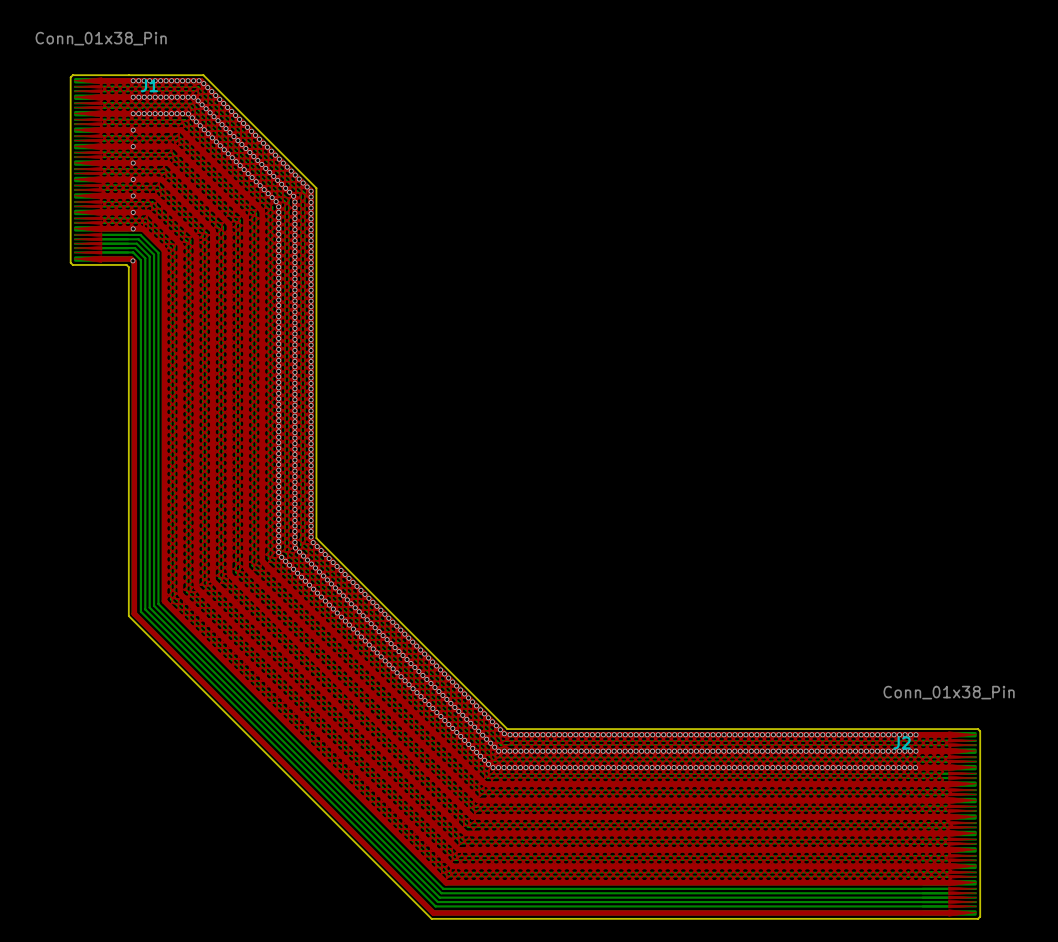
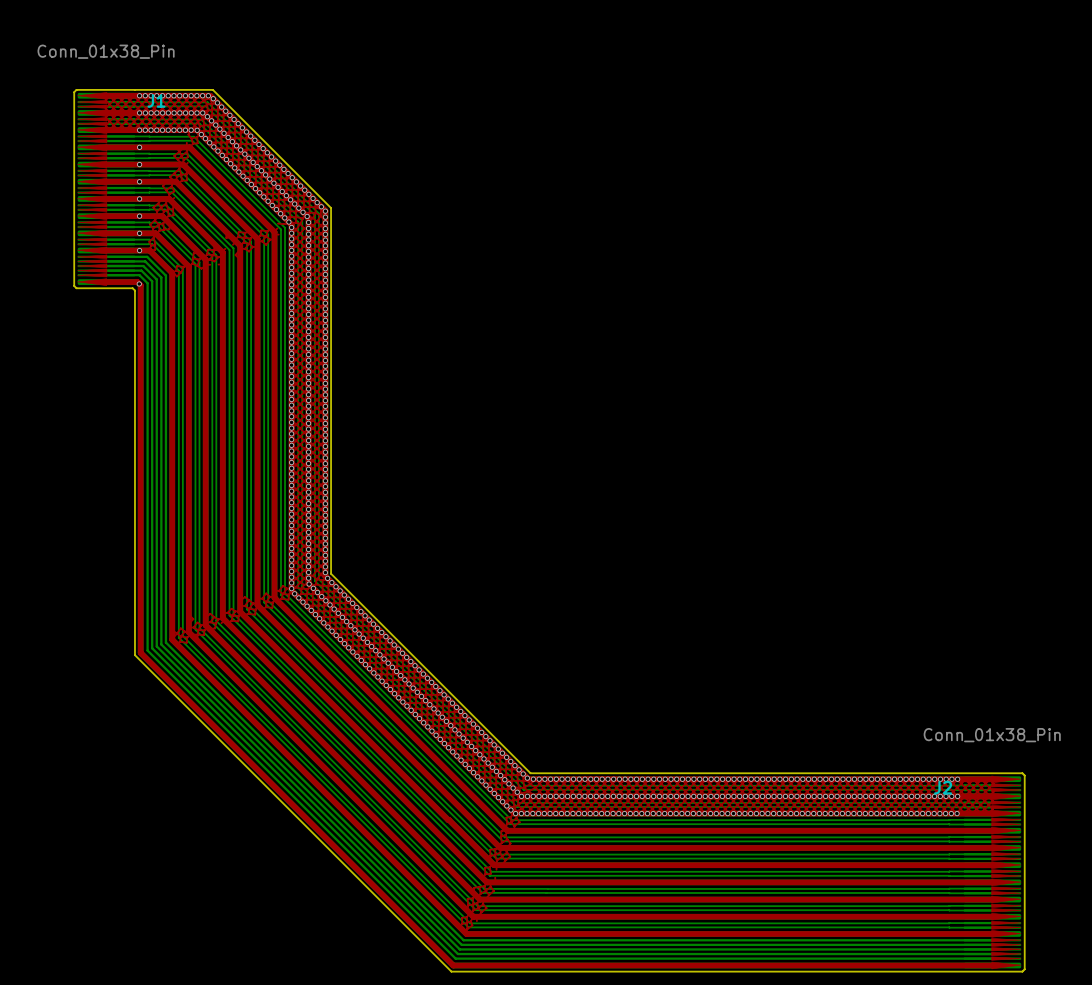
top track: (112, 114) (128, 129) (143, 114) (159, 129) (174, 114) (179, 118) (166, 129) (151, 114) (135, 129) (120, 114) (104, 129) (100, 125) (112, 114) -> none
top track: (194, 120) (194, 142) (216, 142) (216, 164) (238, 164) (238, 186) (260, 186) (260, 208) -> none
top track: (182, 121) (178, 125) (166, 114) (151, 129) (135, 114) (120, 129) (104, 114) (100, 118) (112, 129) (128, 114) (143, 129) (159, 114) (174, 129) -> none
top track: (166, 130) (150, 146) (135, 130) (119, 146) (104, 130) (100, 134) (112, 146) (127, 130) (143, 146) (158, 130) (166, 138) (158, 146) (143, 130) (127, 146) (112, 130) (100, 142) (104, 146) (119, 130) (135, 146) (150, 130) (166, 146) (169, 142) -> none
top track: (183, 131) (205, 131) (205, 153) (227, 153) (227, 175) (249, 175) (249, 197) (271, 197) (270, 209) -> none
top track: (184, 133) (184, 155) (206, 155) (206, 177) (228, 177) (228, 199) (250, 199) (250, 204) (249, 209) (239, 210) (239, 188) (217, 188) (217, 166) (195, 166) (195, 144) (184, 144) (179, 144) (179, 139) (184, 138) (189, 138) (189, 160) (211, 160) (211, 182) (233, 182) (233, 204) (255, 204) -> none
top track: (112, 147) (127, 162) (143, 147) (158, 162) (162, 158) (151, 147) (135, 162) (120, 147) (104, 162) (100, 158) (112, 147) -> none
top track: (166, 147) (151, 162) (135, 147) (120, 162) (104, 147) (100, 150) (112, 162) (127, 147) (143, 162) (158, 147) (166, 154) -> none
top track: (178, 149) (200, 149) (200, 171) (222, 171) (222, 193) (244, 193) (244, 215) -> none
top track: (178, 155) (184, 156) (184, 178) (206, 178) (206, 200) (228, 200) (228, 211) (217, 211) (217, 189) (195, 189) (195, 167) (173, 167) -> none
top track: (171, 166) (171, 188) (193, 188) (193, 210) (215, 210) -> none
top track: (158, 171) (150, 179) (135, 163) (119, 179) (104, 163) (100, 167) (112, 179) (127, 163) (143, 179) (150, 171) (155, 167) (150, 163) (135, 179) (119, 163) (104, 179) (100, 175) (112, 163) (127, 179) (143, 163) (158, 179) -> none
top track: (99, 179) (115, 195) (130, 179) (146, 195) -> none
top track: (107, 179) (123, 195) (138, 179) (146, 187) (138, 195) (123, 179) (107, 195) (99, 187) (107, 179) -> none
top track: (151, 183) (146, 179) (130, 195) (115, 179) (99, 195) -> none
top track: (166, 183) (187, 183) (187, 205) (209, 205) (209, 227) -> none
top track: (165, 189) (171, 189) (171, 211) (193, 211) (193, 233) -> none
top track: (165, 195) (176, 195) (176, 217) (198, 217) (198, 228) (187, 228) (187, 206) (165, 206) (165, 195) -> none
top track: (147, 199) (143, 196) (127, 211) (112, 196) (100, 208) (104, 211) (120, 196) (135, 211) (143, 204) (135, 196) (120, 211) (104, 196) (100, 200) (112, 211) (127, 196) (143, 211) -> none
top track: (160, 200) (182, 200) (182, 222) (204, 222) -> none
top track: (265, 203) (254, 203) (254, 181) (232, 181) (232, 159) (210, 159) (210, 137) (188, 137) (188, 126) (199, 126) (199, 148) (221, 148) (221, 170) (243, 170) (243, 192) (265, 192) (265, 203) -> none
top track: (265, 203) (265, 207) (270, 209) -> none
top track: (156, 208) (156, 220) (178, 220) (178, 242) -> none
top track: (161, 208) (162, 225) (184, 225) (185, 231) (167, 231) (167, 209) (161, 208) -> none
top track: (278, 208) (262, 223) (278, 239) (262, 254) (278, 270) (262, 285) (278, 301) (262, 317) (278, 332) (262, 348) (278, 363) (262, 379) (278, 394) (262, 410) (278, 425) (262, 441) (278, 456) (262, 472) (278, 487) (262, 503) (278, 518) (262, 534) (278, 549) -> none
top track: (270, 209) (266, 213) (278, 223) (262, 239) (278, 254) (262, 270) (278, 285) (262, 301) (278, 317) (262, 332) (278, 348) (262, 363) (278, 379) (262, 394) (278, 410) (262, 425) (278, 441) (262, 456) (278, 472) (262, 487) (278, 503) (262, 518) (278, 534) (262, 549) -> none
top track: (270, 209) (278, 216) (262, 231) (278, 247) (262, 262) (278, 278) (262, 293) (278, 309) (262, 324) (278, 340) (262, 355) (278, 371) (262, 386) (278, 402) (262, 417) (278, 433) (262, 448) (278, 464) (262, 479) (278, 495) (262, 510) (278, 526) (262, 541) (270, 549) (278, 541) (262, 526) (278, 510) (262, 495) (278, 479) (262, 464) (278, 448) (262, 433) (278, 417) (262, 402) (278, 386) (262, 371) (278, 355) (262, 340) (278, 324) (262, 309) (278, 293) (262, 278) (278, 262) (262, 247) (278, 231) (262, 216) -> none
top track: (234, 211) (233, 205) (211, 205) (211, 183) (189, 183) (189, 161) (178, 161) (178, 172) (200, 172) (200, 194) (222, 194) (222, 216) -> none
top track: (143, 212) (127, 228) (112, 212) (100, 224) (104, 228) (120, 212) (135, 228) (139, 224) (142, 220) (139, 216) (135, 212) (120, 228) (104, 212) (100, 216) (112, 228) (127, 212) (143, 228) -> none
top track: (151, 214) (173, 214) (173, 236) (184, 236) -> none
top track: (153, 216) (153, 238) (175, 238) -> none
top track: (148, 222) (158, 222) (158, 244) (164, 244) (169, 243) (169, 233) (147, 233) (148, 228) (153, 227) (164, 227) (164, 249) -> none
top track: (215, 222) (204, 221) (204, 199) (182, 199) (182, 177) (171, 177) (166, 178) (166, 172) (176, 172) (176, 194) (198, 194) (198, 216) (209, 216) (216, 216) (215, 222) -> none
top track: (215, 222) (215, 227) (221, 229) (213, 238) (228, 253) (213, 269) (228, 284) (213, 300) (228, 315) (213, 331) (228, 346) (213, 362) (228, 377) (213, 393) (228, 408) (213, 424) (228, 439) (213, 455) (228, 470) (213, 486) (228, 501) (213, 517) (228, 532) (213, 548) (228, 563) (221, 571) (213, 563) (228, 548) (213, 532) (228, 517) (213, 501) (228, 486) (213, 470) (228, 455) (213, 439) (228, 424) (213, 408) (228, 393) (213, 377) (228, 362) (213, 346) (228, 331) (213, 315) (228, 300) (213, 284) (228, 269) (213, 253) (228, 238) -> none
top track: (215, 222) (222, 223) (221, 229) (225, 233) (213, 245) (228, 261) (213, 276) (228, 292) (213, 307) (228, 323) (213, 338) (228, 354) (213, 369) (228, 385) (213, 400) (228, 416) (213, 432) (228, 447) (213, 463) (228, 478) (213, 494) (228, 509) (213, 525) (228, 540) (213, 556) (228, 571) -> none
top track: (246, 223) (262, 238) (246, 254) (262, 269) (246, 285) (262, 300) (246, 316) (262, 332) (246, 347) (262, 363) (246, 378) (262, 394) (246, 409) (262, 425) (246, 440) (262, 456) (246, 471) (262, 487) (246, 502) (262, 518) (246, 533) (262, 549) (254, 556) (246, 549) (262, 533) (246, 518) (262, 502) (246, 487) (262, 471) (246, 456) (262, 440) (246, 425) (262, 409) (246, 394) (262, 378) (246, 363) (262, 347) (246, 332) (262, 316) (246, 300) (262, 285) (246, 269) (262, 254) (246, 238) (262, 223) -> none
top track: (230, 229) (245, 245) (230, 260) (245, 276) (230, 291) (245, 307) (230, 322) (245, 338) (230, 353) (245, 369) (230, 384) (245, 400) (230, 416) (245, 431) (230, 447) (245, 462) (230, 478) (245, 493) (230, 509) (245, 524) (230, 540) (245, 555) (237, 563) -> none
top track: (245, 229) (230, 245) (245, 260) (230, 276) (245, 291) (230, 307) (245, 322) (230, 338) (245, 353) (230, 369) (245, 384) (230, 400) (245, 416) (230, 431) (245, 447) (230, 462) (245, 478) (230, 493) (245, 509) (230, 524) (245, 540) (230, 555) (233, 560) (237, 555) (245, 547) (230, 532) (245, 516) (230, 501) (245, 485) (230, 470) (245, 454) (230, 439) (245, 423) (230, 408) (245, 392) (230, 377) (245, 361) (230, 346) (245, 330) (230, 315) (245, 299) (230, 284) (245, 268) (230, 253) (245, 237) (237, 229) (230, 237) (245, 253) (230, 268) (245, 284) (230, 299) (245, 315) (230, 330) (245, 346) (230, 361) (245, 377) (230, 392) (245, 408) (230, 423) (245, 439) (230, 454) (245, 470) (230, 485) (245, 501) (230, 516) (245, 532) (230, 547) (245, 563) -> none
top track: (213, 230) (228, 245) (213, 261) (228, 276) (213, 292) (228, 307) (213, 323) (228, 338) (213, 354) (228, 369) (213, 385) (228, 400) (213, 416) (228, 432) (213, 447) (228, 463) (213, 478) (228, 494) (213, 509) (228, 525) (213, 540) (228, 556) (213, 571) -> none
top track: (180, 243) (196, 259) (180, 274) (196, 290) (180, 305) (196, 321) (180, 336) (196, 352) (180, 367) (196, 383) (180, 398) (196, 414) (180, 429) (196, 445) (180, 460) (196, 476) (180, 491) (196, 507) (180, 522) (196, 538) (180, 553) (196, 569) (188, 577) (184, 581) (188, 584) (196, 577) (180, 561) (196, 546) (180, 530) (196, 515) (180, 499) (196, 484) (180, 468) (196, 453) (180, 437) (196, 421) (180, 406) (196, 390) (180, 375) (196, 359) (180, 344) (196, 328) (180, 313) (196, 297) (180, 282) (196, 266) (180, 251) (188, 243) -> none
top track: (197, 246) (212, 261) (197, 277) (212, 292) (197, 308) (212, 323) (197, 339) (212, 354) (197, 370) (212, 386) (197, 401) (212, 417) (197, 432) (212, 448) (197, 463) (212, 479) (197, 494) (212, 510) (197, 525) (212, 541) (197, 556) (212, 572) (204, 579) -> none
top track: (212, 246) (197, 261) (212, 277) (197, 292) (212, 308) (197, 323) (212, 339) (197, 354) (212, 370) (197, 386) (212, 401) (197, 417) (212, 432) (197, 448) (212, 463) (197, 479) (212, 494) (197, 510) (212, 525) (197, 541) (212, 556) (197, 572) (200, 576) (204, 572) (212, 564) (197, 548) (212, 533) (197, 517) (212, 502) (197, 486) (212, 471) (197, 455) (212, 440) (197, 424) (212, 409) (197, 393) (212, 378) (197, 362) (212, 347) (197, 331) (212, 316) (197, 300) (212, 285) (197, 269) (212, 254) (200, 242) (204, 239) (208, 242) (204, 246) (197, 254) (212, 269) (197, 285) (212, 300) (197, 316) (212, 331) (197, 347) (212, 362) (197, 378) (212, 393) (197, 409) (212, 424) (197, 440) (212, 455) (197, 471) (212, 486) (197, 502) (212, 517) (197, 533) (212, 548) (197, 564) (212, 579) -> none
top track: (172, 249) (180, 256) (164, 272) (180, 287) (164, 303) (180, 318) (164, 334) (180, 349) (164, 365) (180, 380) (164, 396) (180, 411) (164, 427) (180, 442) (164, 458) (180, 474) (164, 489) (180, 505) (164, 520) (180, 536) (164, 551) (180, 567) (164, 582) (172, 590) (180, 582) (164, 567) (180, 551) (164, 536) (180, 520) (164, 505) (180, 489) (164, 474) (180, 458) (164, 442) (180, 427) (164, 411) (180, 396) (164, 380) (180, 365) (164, 349) (180, 334) (164, 318) (180, 303) (164, 287) (180, 272) (164, 256) (168, 253) (172, 256) (180, 264) (164, 280) (180, 295) (164, 311) (180, 326) (164, 342) (180, 357) (164, 373) (180, 388) (164, 404) (180, 419) (164, 435) (180, 450) (164, 466) (180, 481) (164, 497) (180, 512) (164, 528) (180, 543) (164, 559) (180, 574) (164, 590) -> none
top track: (180, 249) (164, 264) (180, 280) (164, 295) (180, 311) (164, 326) (180, 342) (164, 357) (180, 373) (164, 388) (180, 404) (164, 419) (180, 435) (164, 450) (180, 466) (164, 481) (180, 497) (164, 512) (180, 528) (164, 543) (180, 559) (164, 574) (180, 590) -> none
top track: (246, 556) (262, 541) (246, 525) (262, 510) (246, 494) (262, 479) (246, 463) (262, 448) (246, 432) (262, 417) (246, 401) (262, 386) (246, 370) (262, 355) (246, 339) (262, 324) (246, 308) (262, 293) (246, 277) (262, 262) (246, 246) (262, 231) (254, 223) (246, 231) (262, 246) (246, 262) (262, 277) (246, 293) (262, 308) (246, 324) (262, 339) (246, 355) (262, 370) (246, 386) (262, 401) (246, 417) (262, 432) (246, 448) (262, 463) (246, 479) (262, 494) (246, 510) (262, 525) (246, 541) (262, 556) -> none
top track: (281, 557) (281, 579) (303, 579) (303, 601) (325, 601) (325, 623) (347, 623) (347, 645) (369, 645) (369, 667) (390, 667) (390, 689) (412, 689) (412, 711) (434, 711) (434, 733) (456, 733) (456, 755) (478, 755) (478, 777) -> none
top track: (275, 563) (286, 563) (286, 585) (308, 585) (308, 606) (330, 606) (330, 628) (352, 628) (352, 650) (374, 650) (374, 672) (396, 672) (396, 694) (418, 694) (418, 716) (440, 716) (440, 738) (462, 738) (462, 760) (484, 760) (484, 771) (473, 771) (473, 749) (451, 749) (451, 727) (429, 727) (429, 705) (407, 705) (407, 683) (385, 683) (385, 661) (363, 661) (363, 639) (341, 639) (341, 617) (319, 617) (319, 596) (297, 596) (297, 574) (275, 574) (275, 563) -> none
top track: (265, 565) (265, 587) (287, 587) (287, 609) (309, 609) (309, 631) (331, 631) (331, 653) (353, 653) (353, 675) (375, 675) (375, 696) (397, 696) (397, 718) (419, 718) (419, 740) (441, 740) (441, 762) (463, 762) (463, 784) (474, 784) (479, 784) (479, 779) (457, 779) (457, 757) (435, 757) (435, 735) (413, 735) (413, 713) (391, 713) (391, 691) (370, 691) (370, 669) (348, 669) (348, 647) (326, 647) (326, 625) (304, 625) (304, 603) (282, 603) (282, 581) (260, 581) (260, 570) (271, 570) (271, 592) (293, 592) (293, 614) (315, 614) (315, 636) (337, 636) (337, 658) (359, 658) (359, 680) (381, 680) (381, 702) (402, 702) (402, 724) (424, 724) (424, 746) (446, 746) (446, 768) (468, 768) (468, 790) (479, 789) -> none
top track: (270, 568) (292, 568) (292, 590) (314, 590) (314, 612) (336, 612) (336, 634) (358, 634) (358, 656) (380, 656) (380, 678) (401, 678) (401, 700) (423, 700) (423, 722) (445, 722) (445, 744) (467, 744) (467, 766) (488, 766) -> none
top track: (249, 571) (249, 593) (271, 593) (271, 615) (293, 615) (293, 637) (315, 637) (315, 659) (337, 659) (337, 681) (358, 681) (358, 703) (380, 703) (380, 725) (402, 725) (402, 747) (424, 747) (424, 769) (446, 769) (446, 791) (468, 791) (468, 802) (457, 802) (457, 780) (435, 780) (435, 758) (413, 758) (413, 736) (391, 736) (391, 714) (369, 714) (369, 692) (348, 692) (348, 670) (326, 670) (326, 648) (304, 648) (304, 626) (282, 626) (282, 604) (260, 604) (260, 582) (238, 582) (237, 576) -> none
top track: (254, 576) (276, 576) (276, 598) (298, 598) (298, 620) (320, 620) (320, 642) (342, 642) (342, 664) (364, 664) (364, 685) (386, 685) (386, 707) (408, 707) (408, 729) (430, 729) (430, 751) (452, 751) (452, 773) (474, 773) (474, 795) -> none
top track: (180, 577) (196, 561) (180, 546) (196, 530) (180, 515) (196, 499) (180, 484) (196, 468) (180, 453) (196, 437) (180, 421) (196, 406) (180, 390) (196, 375) (180, 359) (196, 344) (180, 328) (196, 313) (180, 297) (196, 282) (180, 266) (196, 251) (192, 246) (180, 259) (196, 274) (180, 290) (196, 305) (180, 321) (196, 336) (180, 352) (196, 367) (180, 383) (196, 398) (180, 414) (196, 429) (180, 445) (196, 460) (180, 476) (196, 491) (180, 507) (196, 522) (180, 538) (196, 553) (180, 569) (196, 584) -> none
top track: (233, 578) (233, 600) (255, 600) (255, 622) (277, 622) (277, 644) (299, 644) (299, 666) (320, 666) (320, 687) (342, 687) (342, 709) (364, 709) (364, 731) (386, 731) (386, 753) (408, 753) (408, 775) (430, 775) (430, 797) (452, 797) (452, 819) (463, 819) (463, 808) (441, 808) (441, 786) (419, 786) (419, 764) (397, 764) (397, 742) (375, 742) (375, 720) (353, 720) (353, 698) (331, 698) (331, 676) (310, 676) (310, 655) (288, 655) (288, 633) (266, 633) (266, 611) (244, 611) (244, 589) (222, 589) -> none
top track: (206, 585) (211, 585) (211, 601) (233, 601) (233, 623) (255, 623) (255, 645) (277, 645) (277, 667) (299, 667) (299, 689) (321, 689) (321, 711) (343, 711) (343, 733) (365, 733) (365, 755) (387, 755) (387, 777) (409, 777) (409, 799) (430, 799) (430, 821) (452, 821) (452, 832) (453, 838) (447, 837) (447, 815) (425, 815) (425, 793) (403, 793) (403, 771) (381, 771) (381, 750) (359, 750) (359, 728) (337, 728) (337, 706) (315, 706) (315, 684) (293, 684) (293, 662) (271, 662) (271, 640) (249, 640) (249, 618) (228, 618) (228, 596) (206, 596) (205, 590) (211, 590) (222, 590) (222, 612) (244, 612) (244, 634) (266, 634) (266, 656) (288, 656) (288, 678) (310, 678) (310, 700) (332, 700) (332, 722) (354, 722) (354, 744) (376, 744) (376, 766) (398, 766) (398, 788) (420, 788) (420, 810) (441, 810) (441, 832) (463, 832) -> none
top track: (217, 585) (217, 607) (238, 607) (238, 629) (260, 629) (260, 651) (282, 651) (282, 673) (304, 673) (304, 695) (326, 695) (326, 717) (348, 717) (348, 739) (370, 739) (370, 760) (392, 760) (392, 782) (414, 782) (414, 804) (436, 804) (436, 826) (458, 826) (458, 837) -> none
top track: (200, 591) (200, 613) (222, 613) (222, 635) (244, 635) (244, 657) (266, 657) (266, 679) (287, 679) (287, 701) (309, 701) (309, 723) (331, 723) (331, 745) (353, 745) (353, 766) (375, 766) (375, 788) (397, 788) (397, 810) (419, 810) (419, 832) (441, 832) (441, 854) (447, 855) -> none
top track: (194, 596) (194, 607) (216, 607) (216, 629) (238, 629) (238, 651) (260, 651) (260, 673) (282, 673) (282, 695) (304, 695) (304, 717) (326, 717) (326, 739) (348, 739) (348, 761) (370, 761) (370, 783) (392, 783) (392, 805) (414, 805) (414, 827) (436, 827) (436, 849) (447, 849) (447, 838) (425, 838) (425, 816) (403, 816) (403, 794) (381, 794) (381, 772) (359, 772) (359, 750) (337, 750) (337, 728) (315, 728) (315, 706) (293, 706) (293, 684) (271, 684) (271, 662) (249, 662) (249, 640) (227, 640) (227, 618) (205, 618) (205, 596) (194, 596) -> none
top track: (183, 598) (183, 620) (205, 620) (205, 642) (227, 642) (227, 664) (249, 664) (249, 686) (271, 686) (271, 708) (293, 708) (293, 730) (315, 730) (315, 752) (337, 752) (337, 774) (359, 774) (359, 796) (381, 796) (381, 818) (403, 818) (403, 840) (425, 840) (425, 862) (447, 862) -> none
top track: (189, 602) (211, 602) (211, 624) (233, 624) (233, 646) (255, 646) (255, 668) (277, 668) (277, 690) (298, 690) (298, 712) (320, 712) (320, 734) (342, 734) (342, 756) (364, 756) (364, 777) (386, 777) (386, 799) (408, 799) (408, 821) (430, 821) (430, 843) (452, 843) -> none
top track: (178, 604) (189, 604) (189, 626) (211, 626) (211, 648) (233, 648) (233, 670) (255, 670) (255, 691) (277, 691) (277, 713) (299, 713) (299, 735) (321, 735) (321, 757) (342, 757) (342, 779) (364, 779) (364, 801) (386, 801) (386, 823) (408, 823) (408, 845) (430, 845) (430, 867) (441, 867) (441, 856) (419, 856) (419, 834) (397, 834) (397, 812) (375, 812) (375, 790) (353, 790) (353, 768) (332, 768) (332, 746) (310, 746) (310, 724) (288, 724) (288, 702) (266, 702) (266, 681) (244, 681) (244, 659) (222, 659) (222, 637) (200, 637) (200, 615) (178, 615) (178, 604) -> none
top track: (172, 609) (194, 609) (194, 631) (216, 631) (216, 653) (238, 653) (238, 675) (260, 675) (260, 697) (282, 697) (282, 719) (304, 719) (304, 741) (326, 741) (326, 763) (348, 763) (348, 785) (370, 785) (370, 807) (392, 807) (392, 829) (414, 829) (414, 851) (436, 851) (436, 873) -> none
top track: (497, 769) (500, 771) (512, 783) (528, 768) (543, 783) (559, 768) (574, 783) (590, 768) (605, 783) (621, 768) (636, 783) (652, 768) (667, 783) (683, 768) (698, 783) (714, 768) (729, 783) (745, 768) (760, 783) (776, 768) (791, 783) (807, 768) (822, 783) (838, 768) (853, 783) (869, 768) (884, 783) (900, 768) (915, 783) (931, 768) (943, 779) (939, 783) (923, 768) (908, 783) (892, 768) (877, 783) (861, 768) (846, 783) (830, 768) (815, 783) (799, 768) (784, 783) (768, 768) (752, 783) (737, 768) (721, 783) (706, 768) (690, 783) (675, 768) (659, 783) (644, 768) (628, 783) (613, 768) (597, 783) (582, 768) (566, 783) (551, 768) (535, 783) (520, 768) (504, 783) (496, 775) (504, 768) (520, 783) (535, 768) (551, 783) (566, 768) (582, 783) (597, 768) (613, 783) (628, 768) (644, 783) (659, 768) (675, 783) (690, 768) (706, 783) (721, 768) (737, 783) (752, 768) (768, 783) (784, 768) (799, 783) (815, 768) (830, 783) (846, 768) (861, 783) (877, 768) (892, 783) (908, 768) (923, 783) (939, 768) (943, 771) (931, 783) (915, 768) (900, 783) (884, 768) (869, 783) (853, 768) (838, 783) (822, 768) (807, 783) (791, 768) (776, 783) (760, 768) (745, 783) (729, 768) (714, 783) (698, 768) (683, 783) (667, 768) (652, 783) (636, 768) (621, 783) (605, 768) (590, 783) (574, 768) (559, 783) (543, 768) (528, 783) (512, 768) (496, 783) -> none
top track: (485, 784) (500, 800) (516, 784) (531, 800) (547, 784) (562, 800) (578, 784) (593, 800) (609, 784) (624, 800) (640, 784) (655, 800) (671, 784) (686, 800) (702, 784) (717, 800) (733, 784) (748, 800) (764, 784) (780, 800) (795, 784) (811, 800) (826, 784) (842, 800) (857, 784) (873, 800) (888, 784) (904, 800) (919, 784) (935, 800) (950, 784) -> none
top track: (485, 792) (492, 784) (508, 800) (524, 784) (539, 800) (555, 784) (570, 800) (586, 784) (601, 800) (617, 784) (632, 800) (648, 784) (663, 800) (679, 784) (694, 800) (710, 784) (725, 800) (741, 784) (756, 800) (772, 784) (787, 800) (803, 784) (818, 800) (834, 784) (849, 800) (865, 784) (880, 800) (896, 784) (911, 800) (927, 784) (942, 800) (950, 792) (942, 784) (927, 800) (911, 784) (896, 800) (880, 784) (865, 800) (849, 784) (834, 800) (818, 784) (803, 800) (787, 784) (772, 800) (756, 784) (741, 800) (725, 784) (710, 800) (694, 784) (679, 800) (663, 784) (648, 800) (632, 784) (617, 800) (601, 784) (586, 800) (570, 784) (555, 800) (539, 784) (524, 800) (508, 784) (492, 800) (488, 796) (492, 792) (500, 784) (516, 800) (531, 784) (547, 800) (562, 784) (578, 800) (593, 784) (609, 800) (624, 784) (640, 800) (655, 784) (671, 800) (686, 784) (702, 800) (717, 784) (733, 800) (748, 784) (764, 800) (780, 784) (795, 800) (811, 784) (826, 800) (842, 784) (857, 800) (873, 784) (888, 800) (904, 784) (919, 800) (935, 784) (950, 800) -> none
top track: (473, 801) (474, 796) (452, 796) (452, 774) (430, 774) (430, 752) (408, 752) (408, 730) (386, 730) (386, 708) (364, 708) (364, 687) (342, 687) (342, 665) (320, 665) (320, 643) (298, 643) (298, 621) (276, 621) (276, 599) (254, 599) (254, 577) (243, 577) (243, 588) (265, 588) (265, 610) (287, 610) (287, 632) (309, 632) (309, 654) (331, 654) (331, 676) (353, 676) (353, 697) (375, 697) (375, 719) (397, 719) (397, 741) (419, 741) (419, 763) (441, 763) (441, 785) (463, 785) (463, 807) (468, 808) -> none
top track: (484, 804) (487, 801) (503, 816) (518, 801) (534, 816) (549, 801) (565, 816) (580, 801) (596, 816) (612, 801) (627, 816) (643, 801) (658, 816) (674, 801) (689, 816) (705, 801) (720, 816) (736, 801) (751, 816) (767, 801) (782, 816) (798, 801) (813, 816) (829, 801) (844, 816) (860, 801) (875, 816) (891, 801) (906, 816) (922, 801) (937, 816) (949, 804) (945, 801) (930, 816) (914, 801) (899, 816) (883, 801) (868, 816) (852, 801) (836, 816) (821, 801) (805, 816) (790, 801) (774, 816) (759, 801) (743, 816) (728, 801) (712, 816) (697, 801) (681, 816) (666, 801) (650, 816) (635, 801) (619, 816) (604, 801) (588, 816) (573, 801) (557, 816) (542, 801) (526, 816) (511, 801) (495, 816) (487, 808) (495, 801) (511, 816) (526, 801) (542, 816) (557, 801) (573, 816) (588, 801) (604, 816) (619, 801) (635, 816) (650, 801) (666, 816) (681, 801) (697, 816) (712, 801) (728, 816) (743, 801) (759, 816) (774, 801) (790, 816) (805, 801) (821, 816) (836, 801) (852, 816) (868, 801) (883, 816) (899, 801) (914, 816) (930, 801) (945, 816) (949, 812) (937, 801) (922, 816) (906, 801) (891, 816) (875, 801) (860, 816) (844, 801) (829, 816) (813, 801) (798, 816) (782, 801) (767, 816) (751, 801) (736, 816) (720, 801) (705, 816) (689, 801) (674, 816) (658, 801) (643, 816) (627, 801) (612, 816) (596, 801) (580, 816) (565, 801) (549, 816) (534, 801) (518, 816) (503, 801) (487, 816) (483, 812) -> none
top track: (469, 814) (447, 814) (447, 792) (425, 792) (425, 770) (403, 770) (403, 748) (381, 748) (381, 726) (359, 726) (359, 704) (337, 704) (337, 682) (315, 682) (315, 660) (293, 660) (293, 638) (271, 638) (271, 616) (249, 616) (249, 594) (227, 594) (227, 583) (238, 583) (238, 605) (260, 605) (260, 627) (282, 627) (282, 649) (304, 649) (304, 671) (326, 671) (326, 693) (348, 693) (348, 715) (370, 715) (370, 737) (392, 737) (392, 759) (414, 759) (414, 781) (436, 781) (436, 803) (458, 803) (458, 825) -> none
top track: (478, 817) (494, 833) (509, 817) (525, 833) (540, 817) (556, 833) (571, 817) (587, 833) (602, 817) (618, 833) (633, 817) (649, 833) (664, 817) (680, 833) (695, 817) (711, 833) (726, 817) (742, 833) (757, 817) (773, 833) (788, 817) (804, 833) (819, 817) (835, 833) (851, 817) (866, 833) (882, 817) (897, 833) (913, 817) (928, 833) (944, 817) (951, 825) (944, 833) (928, 817) (913, 833) (897, 817) (882, 833) (866, 817) (851, 833) (835, 817) (819, 833) (804, 817) (788, 833) (773, 817) (757, 833) (742, 817) (726, 833) (711, 817) (695, 833) (680, 817) (664, 833) (649, 817) (633, 833) (618, 817) (602, 833) (587, 817) (571, 833) (556, 817) (540, 833) (525, 817) (509, 833) (494, 817) (478, 833) -> none
top track: (951, 817) (936, 833) (920, 817) (905, 833) (889, 817) (874, 833) (858, 817) (843, 833) (827, 817) (812, 833) (796, 817) (781, 833) (765, 817) (750, 833) (734, 817) (719, 833) (703, 817) (688, 833) (672, 817) (657, 833) (641, 817) (626, 833) (610, 817) (595, 833) (579, 817) (563, 833) (548, 817) (532, 833) (517, 817) (501, 833) (486, 817) (478, 825) (473, 829) (469, 825) (474, 821) (486, 833) (501, 817) (517, 833) (532, 817) (548, 833) (563, 817) (579, 833) (595, 817) (610, 833) (626, 817) (641, 833) (657, 817) (672, 833) (688, 817) (703, 833) (719, 817) (734, 833) (750, 817) (765, 833) (781, 817) (796, 833) (812, 817) (827, 833) (843, 817) (858, 833) (874, 817) (889, 833) (905, 817) (920, 833) (936, 817) (951, 833) -> none
top track: (472, 833) (487, 849) (503, 833) (518, 849) (534, 833) (549, 849) (565, 833) (580, 849) (596, 833) (611, 849) (627, 833) (642, 849) (658, 833) (674, 849) (689, 833) (705, 849) (720, 833) (736, 849) (751, 833) (767, 849) (782, 833) (798, 849) (813, 833) (829, 849) (844, 833) (860, 849) (875, 833) (891, 849) (906, 833) (922, 849) (937, 833) (949, 845) (945, 849) (930, 833) (914, 849) (898, 833) (883, 849) (867, 833) (852, 849) (836, 833) (821, 849) (805, 833) (790, 849) (774, 833) (759, 849) (743, 833) (728, 849) (712, 833) (697, 849) (681, 833) (666, 849) (650, 833) (635, 849) (619, 833) (604, 849) (588, 833) (573, 849) (557, 833) (542, 849) (526, 833) (511, 849) (495, 833) (480, 849) (472, 841) (480, 833) (495, 849) (511, 833) (526, 849) (542, 833) (557, 849) (573, 833) (588, 849) (604, 833) (619, 849) (635, 833) (650, 849) (666, 833) (681, 849) (697, 833) (712, 849) (728, 833) (743, 849) (759, 833) (774, 849) (790, 833) (805, 849) (821, 833) (836, 849) (852, 833) (867, 849) (883, 833) (898, 849) (914, 833) (930, 849) (945, 833) (949, 837) (937, 849) (922, 833) (906, 849) (891, 833) (875, 849) (860, 833) (844, 849) (829, 833) (813, 849) (798, 833) (782, 849) (767, 833) (751, 849) (736, 833) (720, 849) (705, 833) (689, 849) (674, 833) (658, 849) (642, 833) (627, 849) (611, 833) (596, 849) (580, 833) (565, 849) (549, 833) (534, 849) (518, 833) (503, 849) (487, 833) (472, 849) (467, 845) -> none
top track: (465, 850) (480, 865) (496, 850) (511, 865) (527, 850) (542, 865) (558, 850) (573, 865) (589, 850) (604, 865) (620, 850) (635, 865) (651, 850) (666, 865) (682, 850) (698, 865) (713, 850) (729, 865) (744, 850) (760, 865) (775, 850) (791, 865) (806, 850) (822, 865) (837, 850) (853, 865) (868, 850) (884, 865) (899, 850) (915, 865) (930, 850) (946, 865) (950, 862) (938, 850) (922, 865) (907, 850) (891, 865) (876, 850) (860, 865) (845, 850) (829, 865) (814, 850) (798, 865) (783, 850) (767, 865) (752, 850) (736, 865) (721, 850) (705, 865) (690, 850) (674, 865) (659, 850) (643, 865) (628, 850) (612, 865) (597, 850) (581, 865) (566, 850) (550, 865) (535, 850) (519, 865) (504, 850) (488, 865) (473, 850) (465, 858) (473, 865) (488, 850) (504, 865) (519, 850) (535, 865) (550, 850) (566, 865) (581, 850) (597, 865) (612, 850) (628, 865) (643, 850) (659, 865) (674, 850) (690, 865) (705, 850) (721, 865) (736, 850) (752, 865) (767, 850) (783, 865) (798, 850) (814, 865) (829, 850) (845, 865) (860, 850) (876, 865) (891, 850) (907, 865) (922, 850) (938, 865) (950, 854) (946, 850) (930, 865) (915, 850) (899, 865) (884, 850) (868, 865) (853, 850) (837, 865) (822, 850) (806, 865) (791, 850) (775, 865) (760, 850) (744, 865) (729, 850) (713, 865) (698, 850) (682, 865) (666, 850) (651, 865) (635, 850) (620, 865) (604, 850) (589, 865) (573, 850) (558, 865) (542, 850) (527, 865) (511, 850) (496, 865) (480, 850) (465, 865) (460, 862) -> none
top track: (458, 866) (473, 882) (489, 866) (504, 882) (520, 866) (535, 882) (551, 866) (566, 882) (582, 866) (597, 882) (613, 866) (628, 882) (644, 866) (660, 882) (675, 866) (691, 882) (706, 866) (722, 882) (737, 866) (753, 882) (768, 866) (784, 882) (799, 866) (815, 882) (830, 866) (846, 882) (861, 866) (877, 882) (892, 866) (908, 882) (923, 866) (939, 882) (950, 870) (947, 866) (931, 882) (916, 866) (900, 882) (885, 866) (869, 882) (853, 866) (838, 882) (822, 866) (807, 882) (791, 866) (776, 882) (760, 866) (745, 882) (729, 866) (714, 882) (698, 866) (683, 882) (667, 866) (652, 882) (636, 866) (621, 882) (605, 866) (590, 882) (574, 866) (559, 882) (543, 866) (528, 882) (512, 866) (497, 882) (481, 866) (466, 882) (458, 874) (455, 870) (451, 874) (454, 878) (458, 882) (473, 866) (489, 882) (504, 866) (520, 882) (535, 866) (551, 882) (566, 866) (582, 882) (597, 866) (613, 882) (628, 866) (644, 882) (660, 866) (675, 882) (691, 866) (706, 882) (722, 866) (737, 882) (753, 866) (768, 882) (784, 866) (799, 882) (815, 866) (830, 882) (846, 866) (861, 882) (877, 866) (892, 882) (908, 866) (923, 882) (939, 866) (950, 878) (947, 882) (931, 866) (916, 882) (900, 866) (885, 882) (869, 866) (853, 882) (838, 866) (822, 882) (807, 866) (791, 882) (776, 866) (760, 882) (745, 866) (729, 882) (714, 866) (698, 882) (683, 866) (667, 882) (652, 866) (636, 882) (621, 866) (605, 882) (590, 866) (574, 882) (559, 866) (543, 882) (528, 866) (512, 882) (497, 866) (481, 882) (466, 866) (450, 882) -> none

